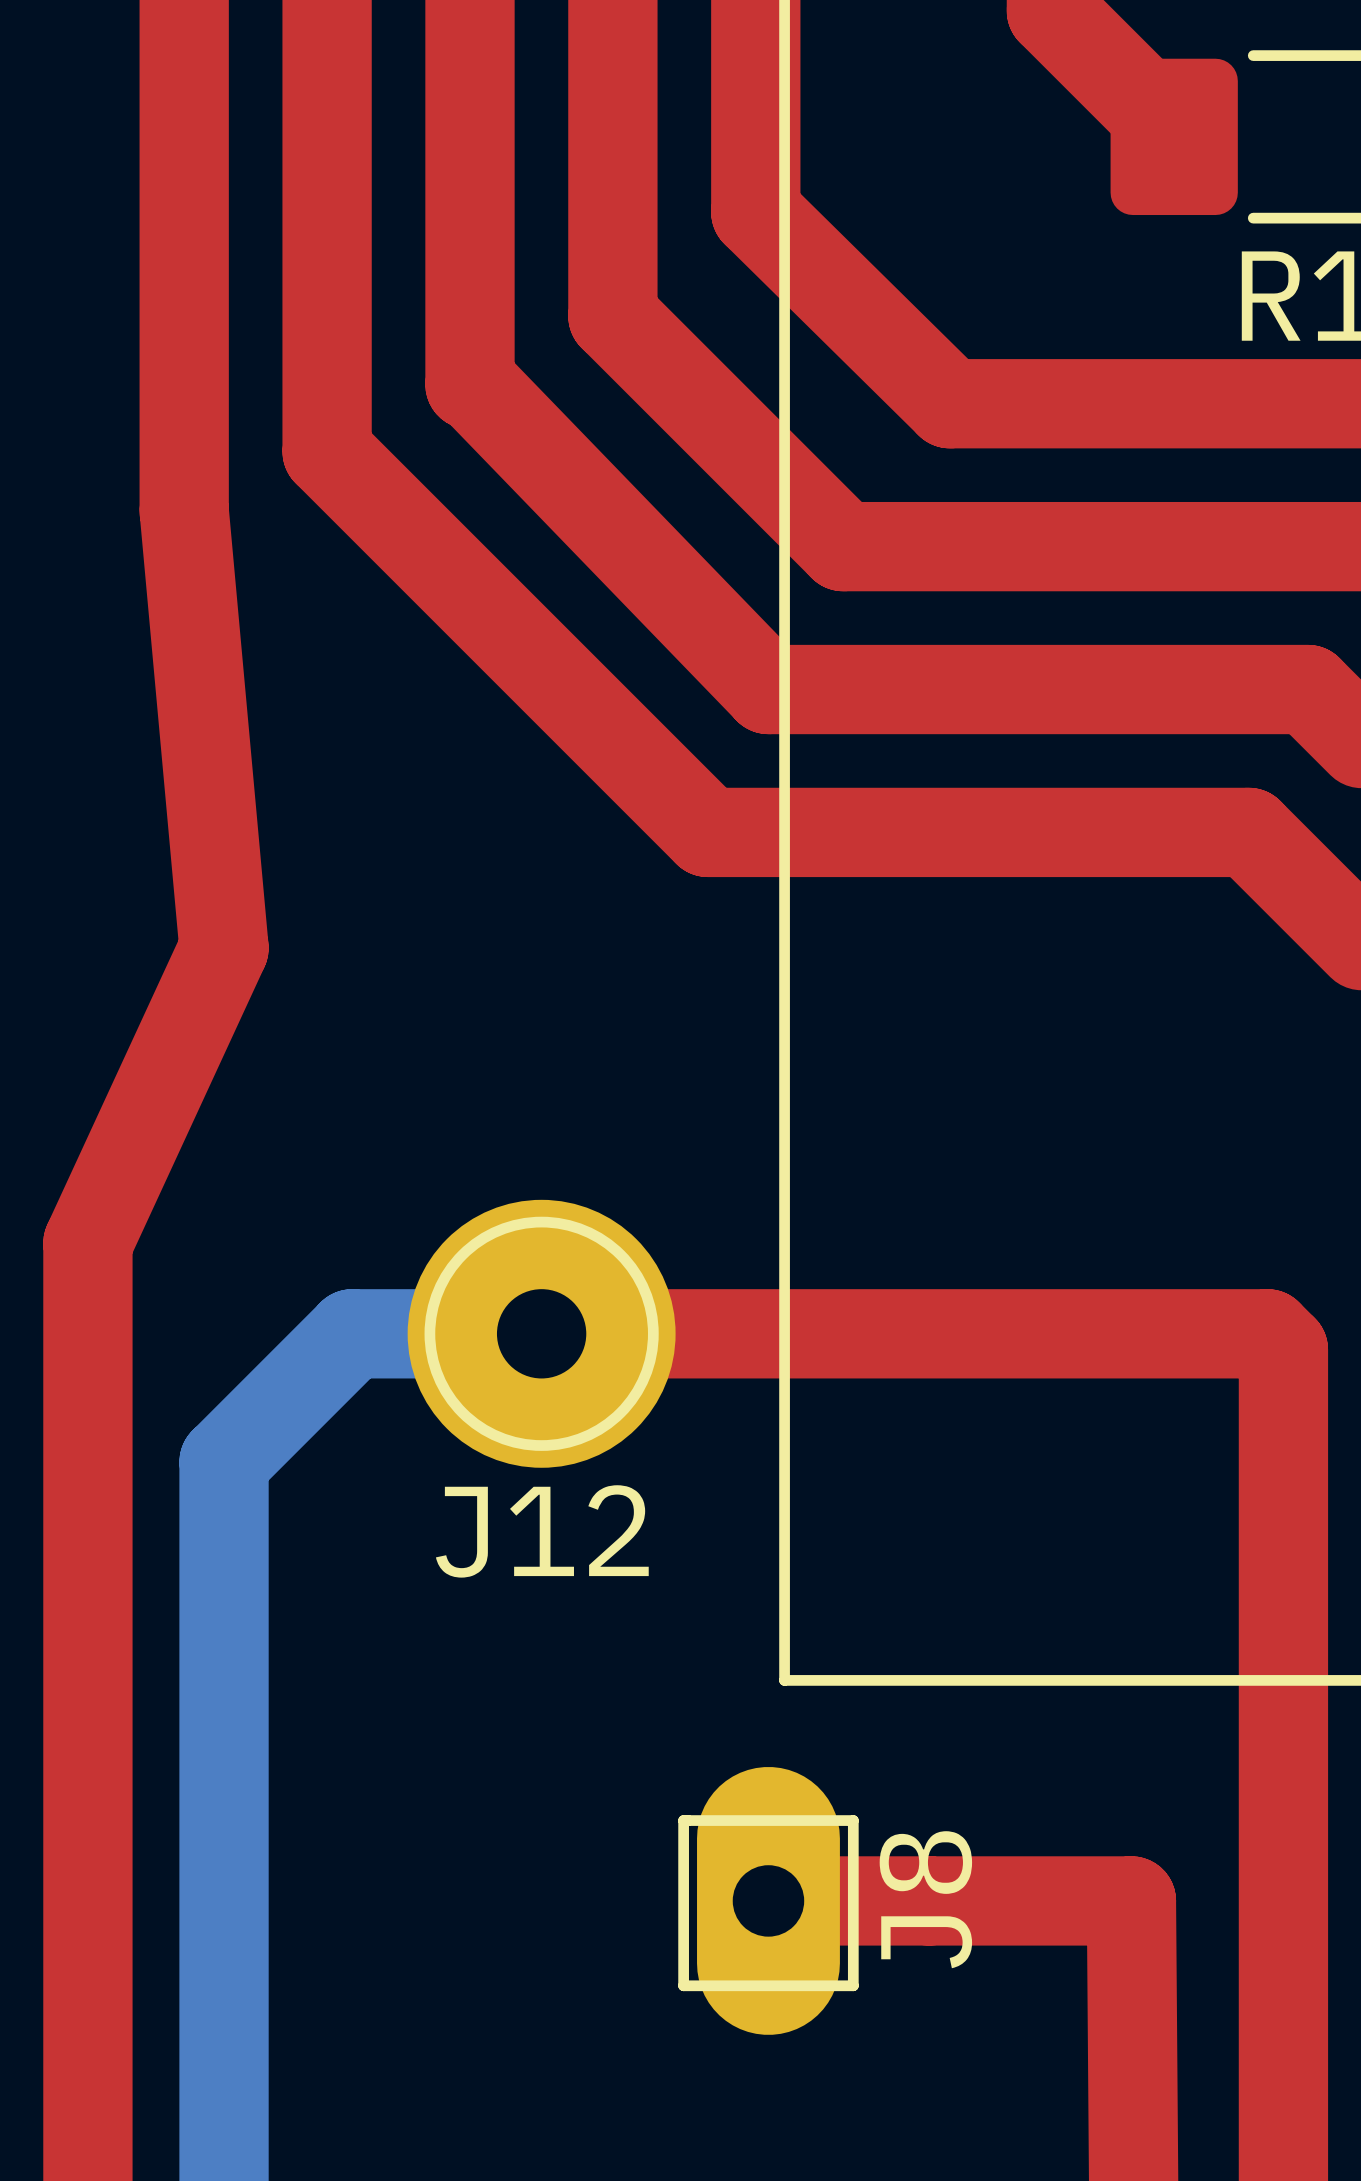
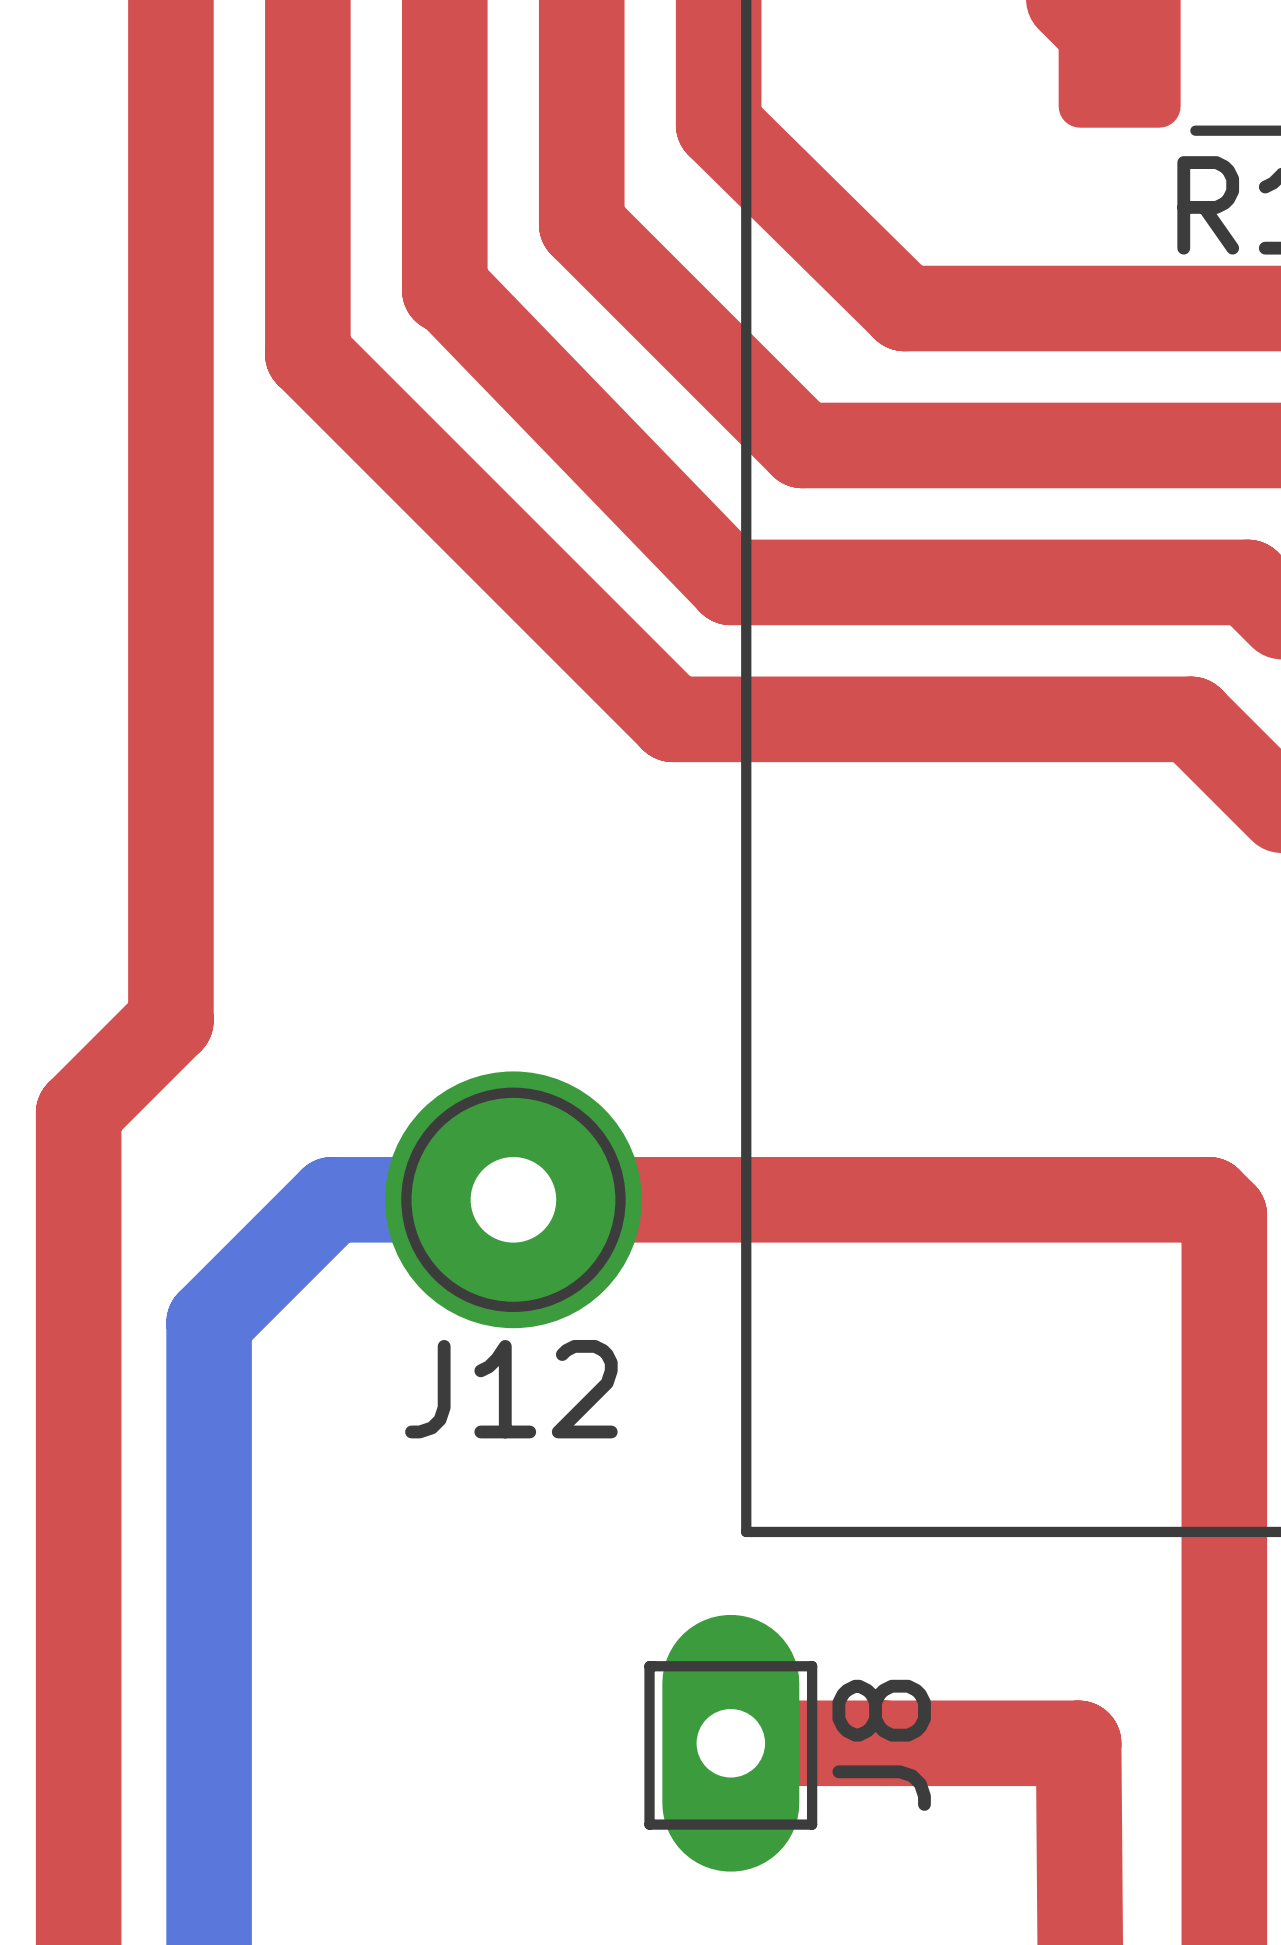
top track: (184, 510) (224, 948) (87, 1243) -> (170, 411) (170, 1020) (78, 1112)

